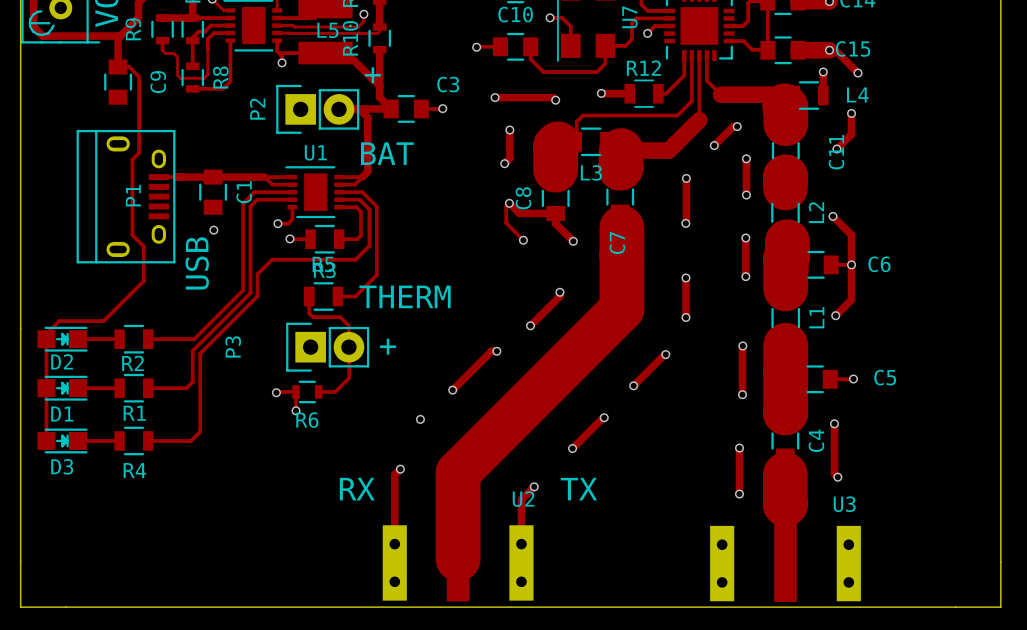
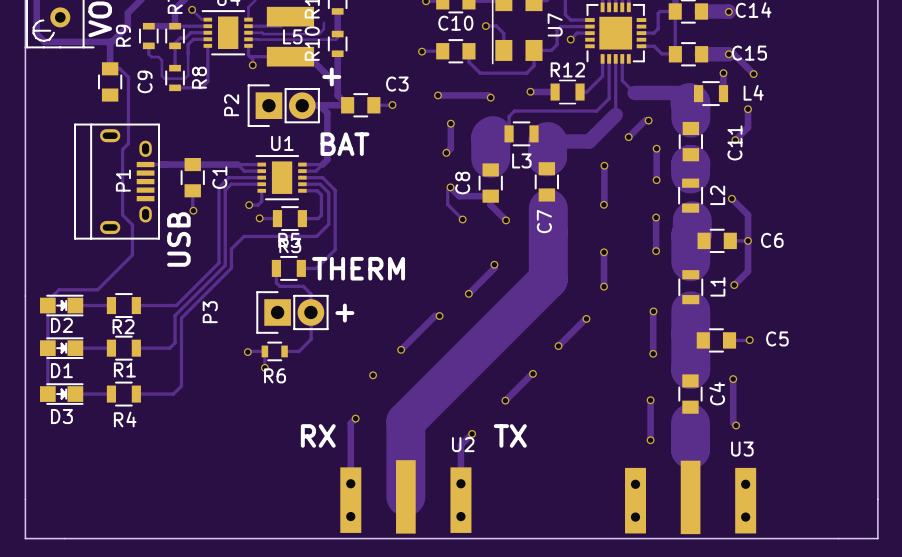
via: (363, 14) -> none
track: none -> (192, 190) (192, 211)

